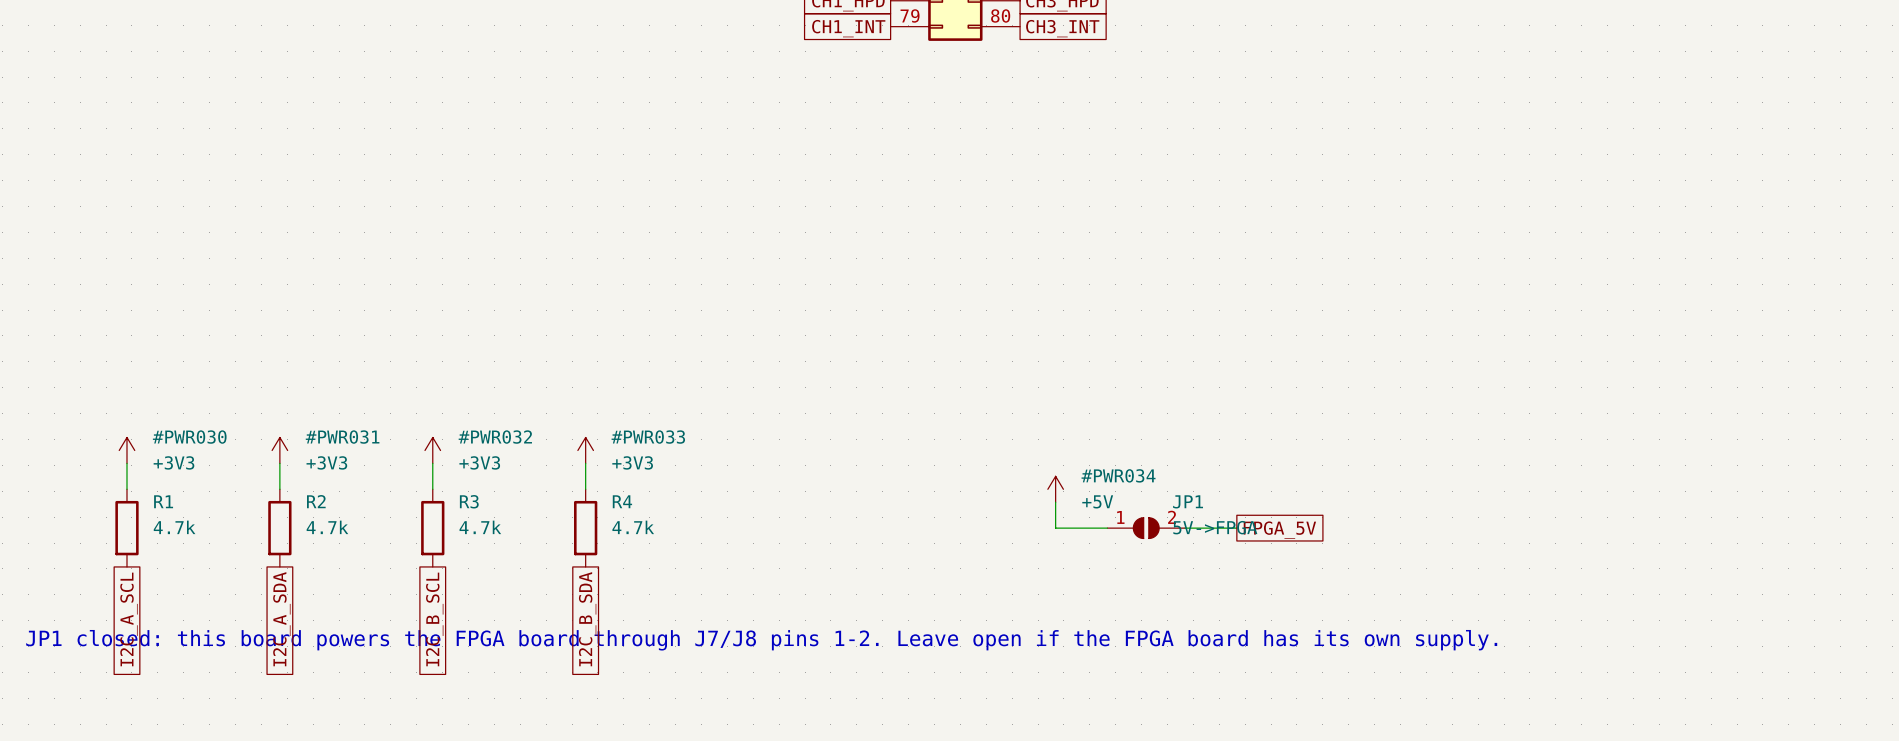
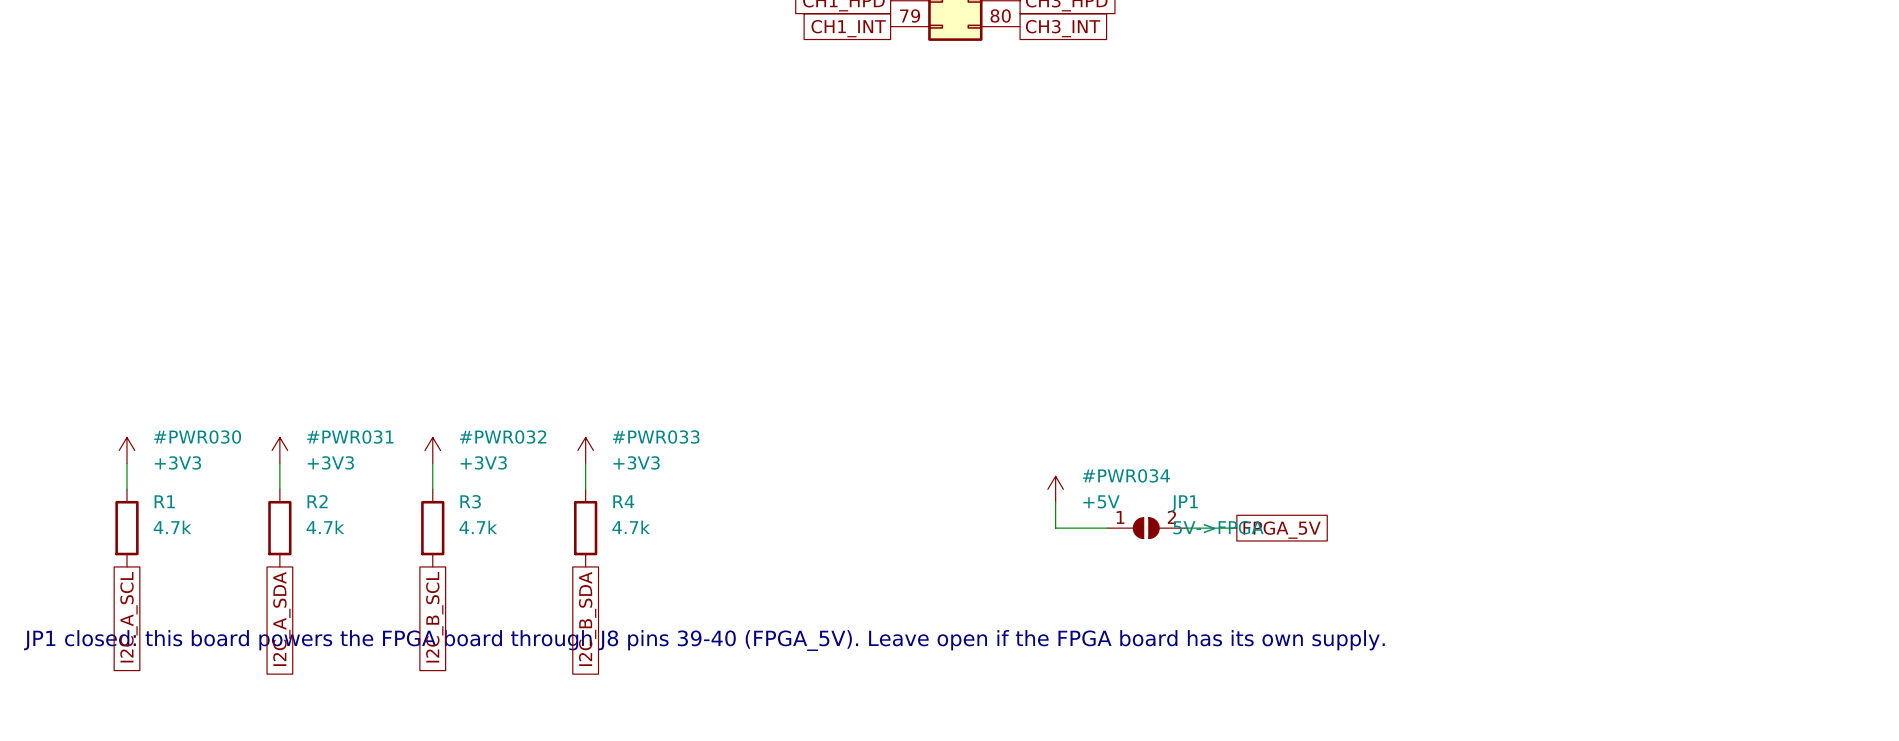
text: JP1 closed: this board powers the FPGA board through J7/J8 pins 1-2. Leave open if the FPGA board has its own supply. (761, 640) -> JP1 closed: this board powers the FPGA board through J8 pins 39-40 (FPGA_5V). Leave open if the FPGA board has its own supply. (704, 640)

